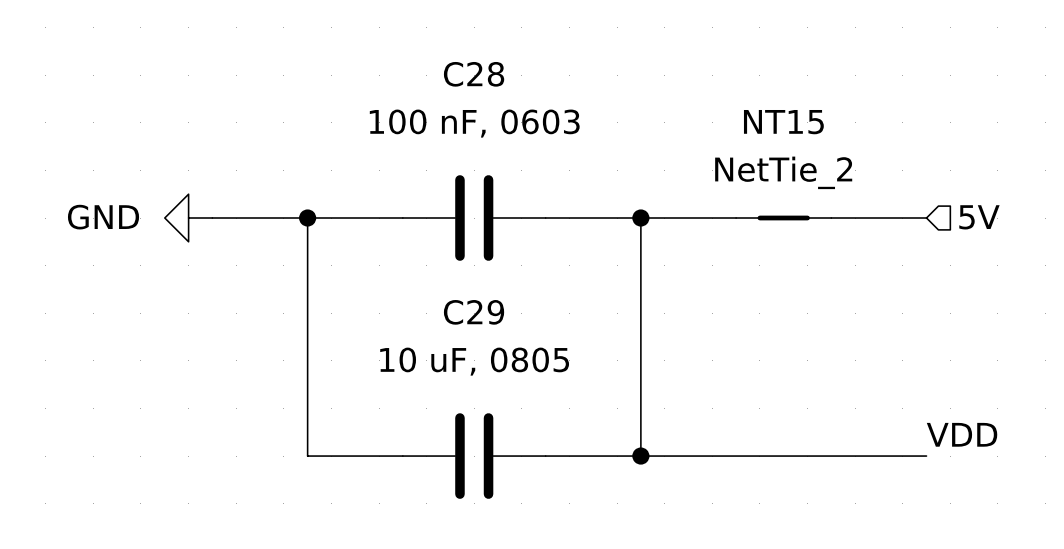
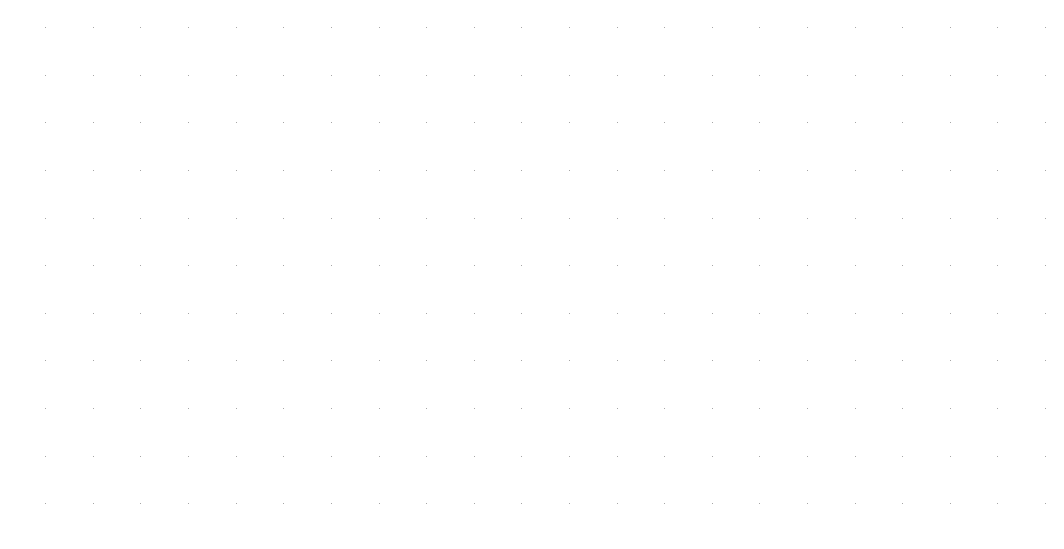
hierarchical label: 5V (979, 217) -> none
power symbol: GND (188, 218) -> none
wire: (212, 218) (402, 218) -> none
wire: (307, 218) (307, 456) (402, 456) -> none
junction: (307, 218) -> none
C28: 100 nF, 0603 (474, 218) -> none
wire: (545, 218) (736, 218) -> none
wire: (640, 218) (640, 456) -> none
junction: (640, 218) -> none
NT15: NetTie_2 (783, 218) -> none
wire: (831, 218) (926, 218) -> none
label: VDD (962, 434) -> none
C29: 10 uF, 0805 (474, 456) -> none
wire: (545, 456) (926, 456) -> none
junction: (640, 456) -> none

